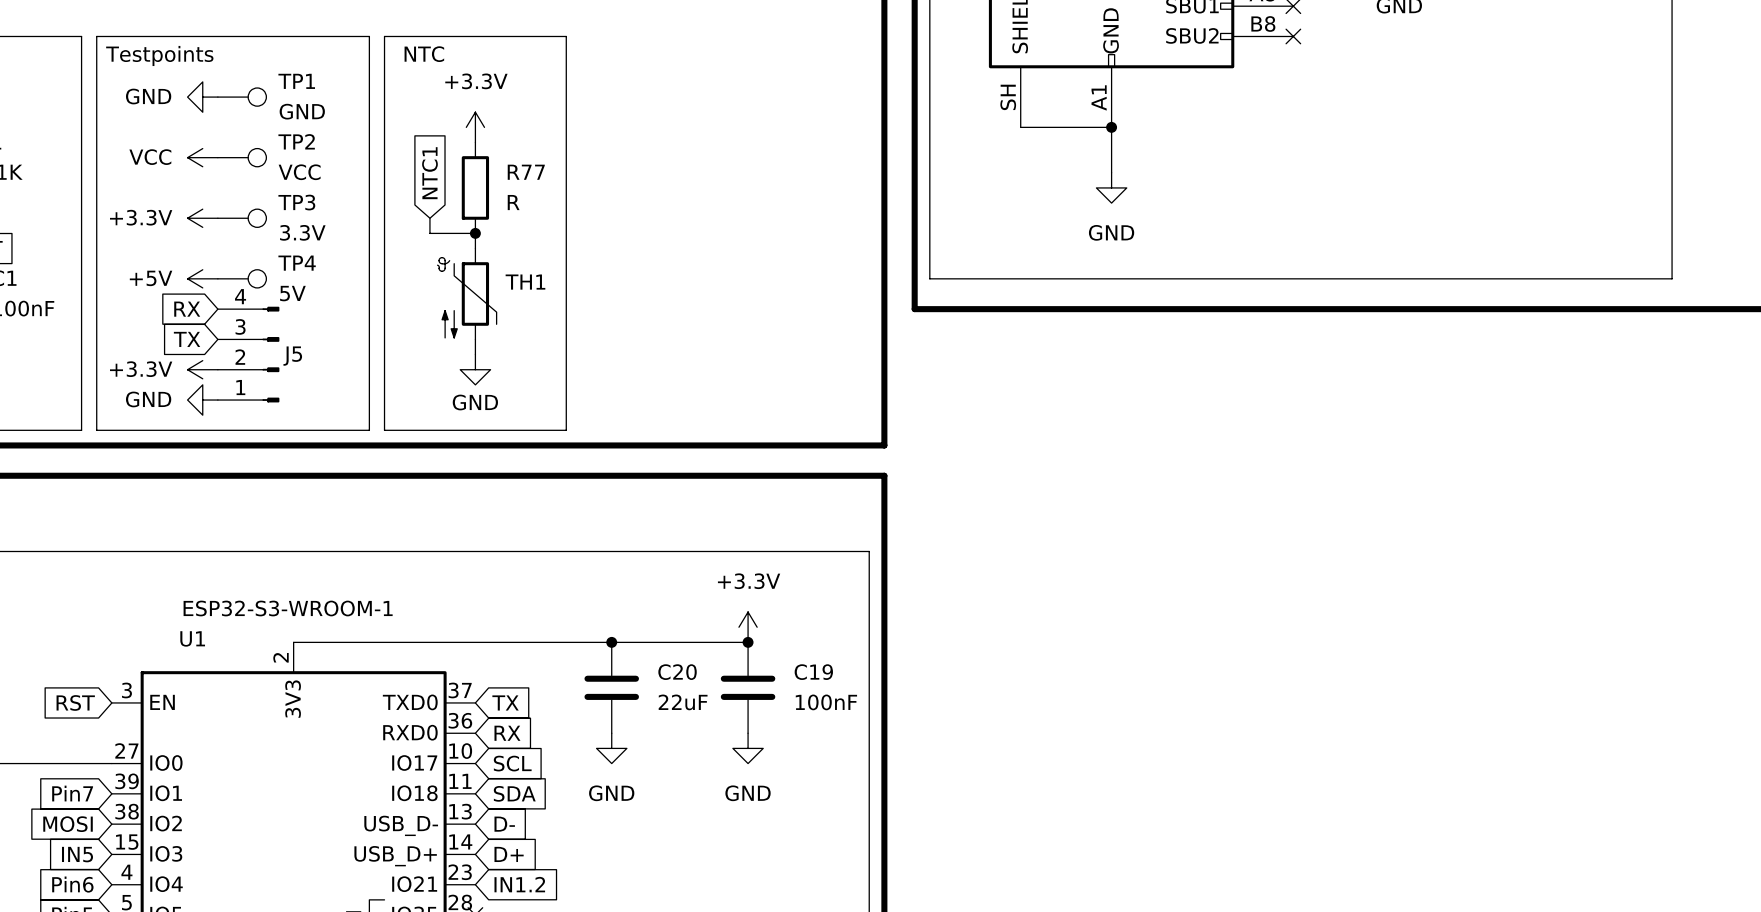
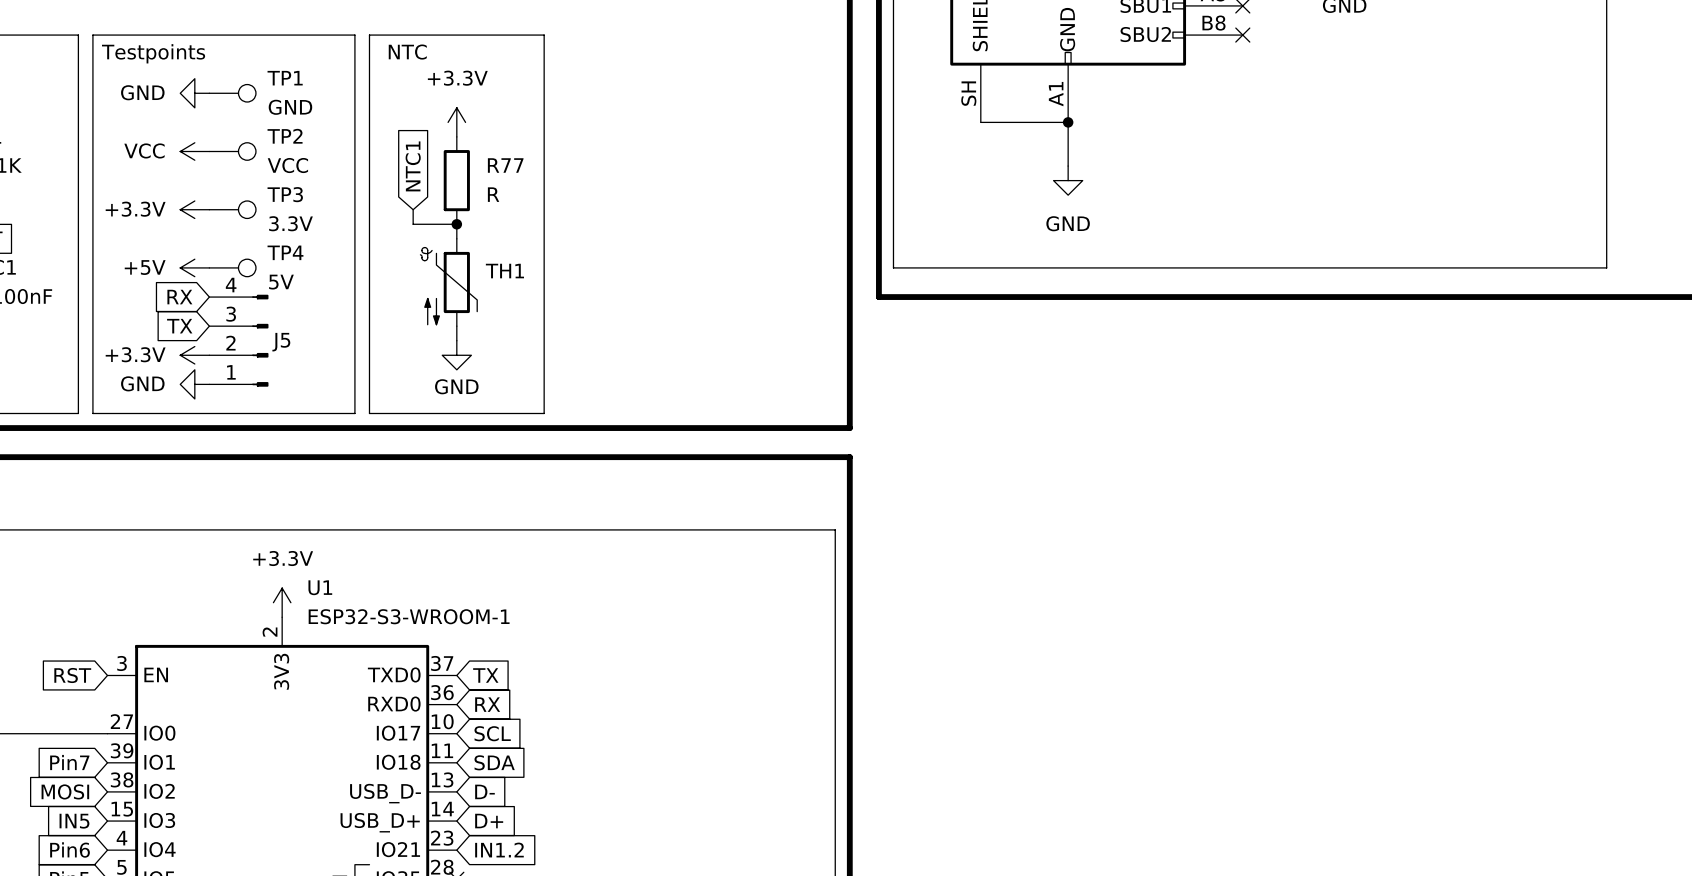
U1 value position: ESP32-S3-WROOM-1 (288, 608) -> ESP32-S3-WROOM-1 (409, 616)
power symbol: none -> +3.3V (282, 602)
power symbol: +3.3V (748, 627) -> none
U1 name position: U1 (192, 638) -> U1 (320, 587)
wire: (293, 642) (748, 642) -> none
junction: (611, 642) -> none
junction: (748, 642) -> none
C20: 22uF (611, 687) -> none
C19: 100nF (748, 687) -> none
power symbol: GND (611, 748) -> none
power symbol: GND (748, 748) -> none

